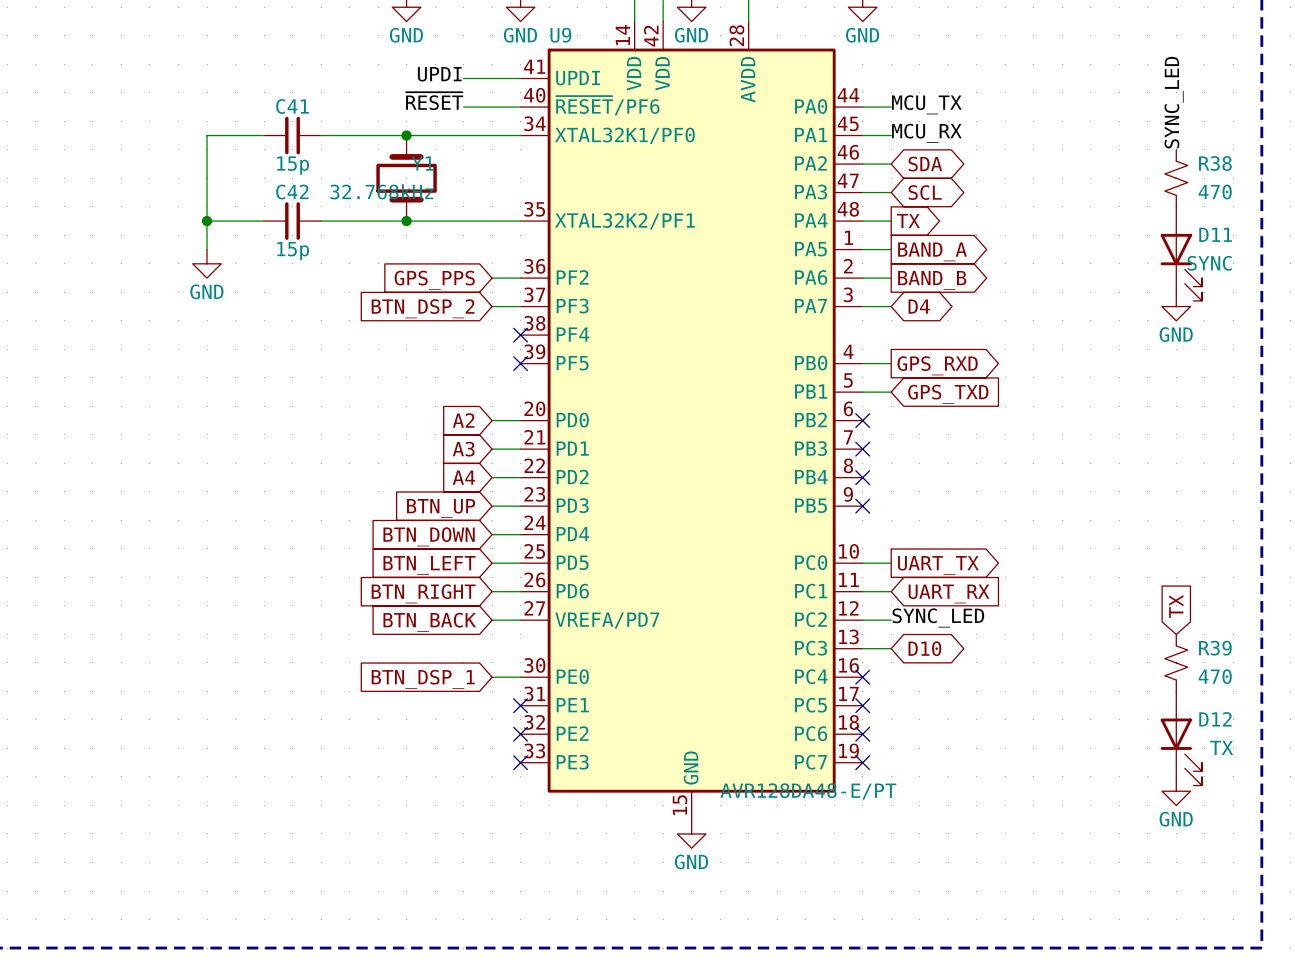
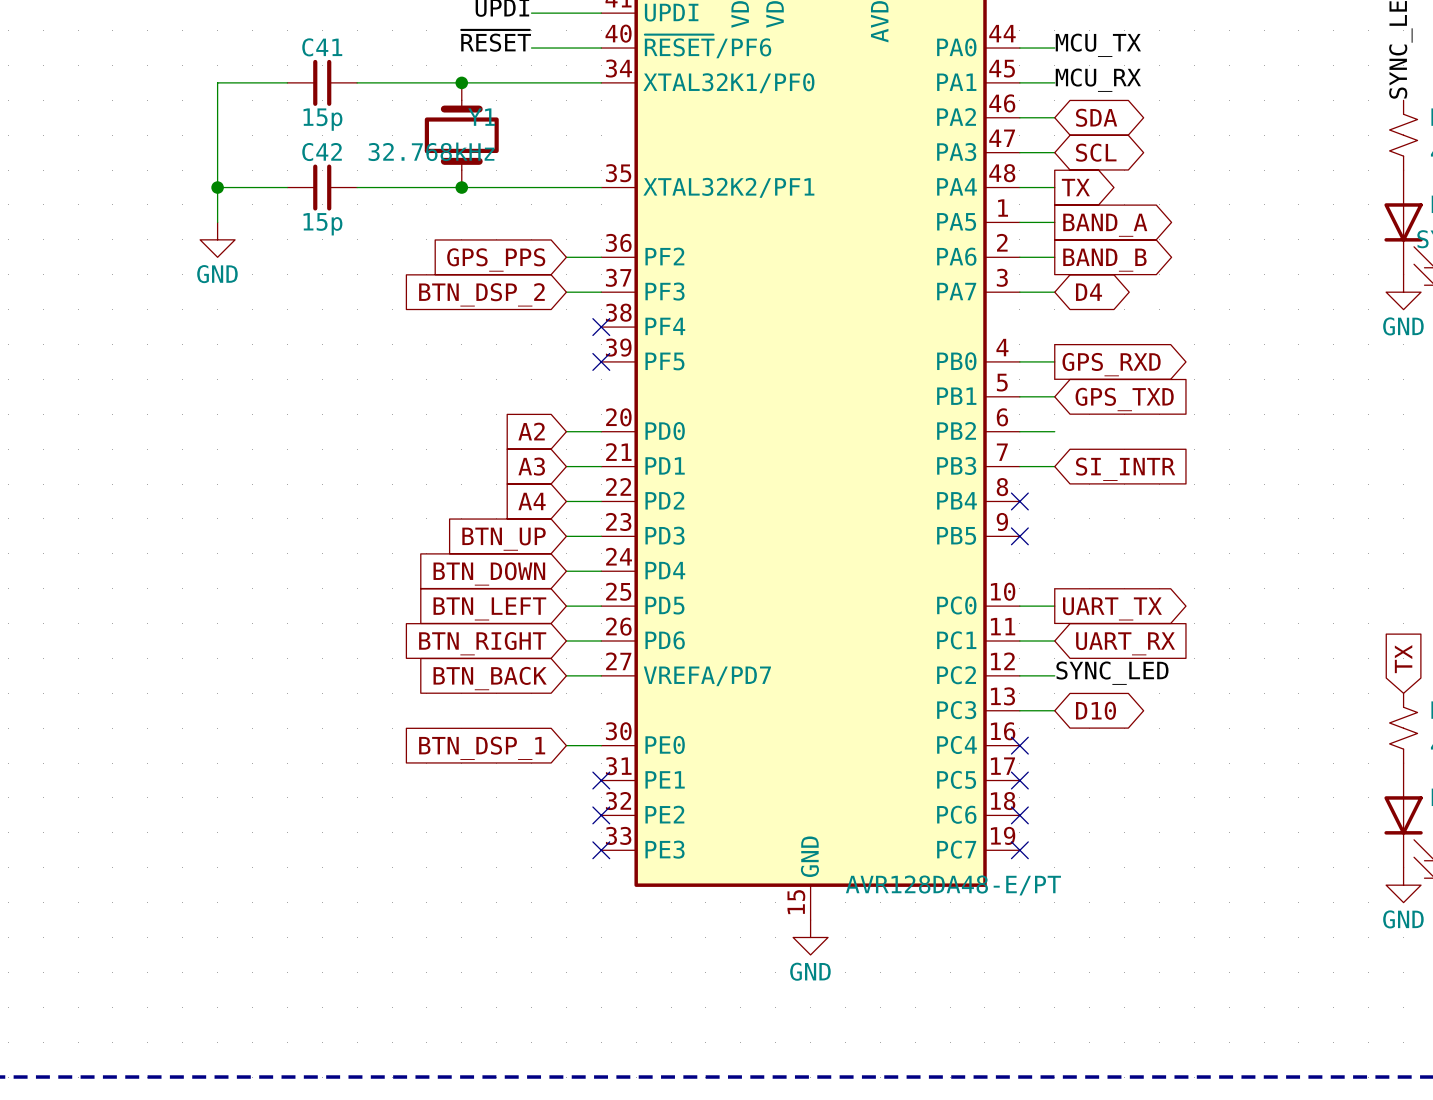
wire: none -> (1019, 431) (1054, 431)
no-connect mark: (862, 420) -> none
wire: none -> (1019, 466) (1054, 466)
no-connect mark: (862, 449) -> none
global label: none -> SI_INTR (1125, 469)

